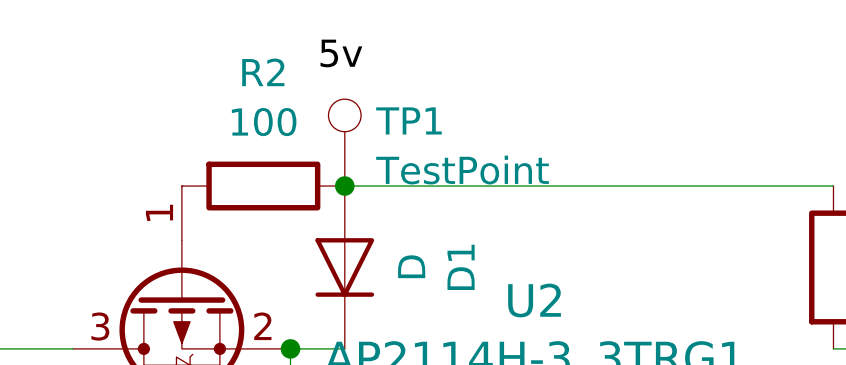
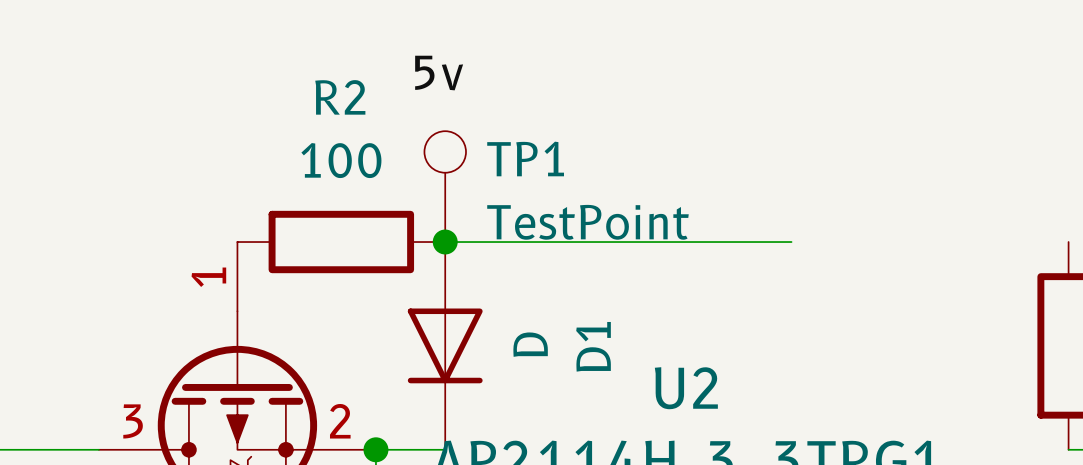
wire: (616, 186) (833, 186) -> none

